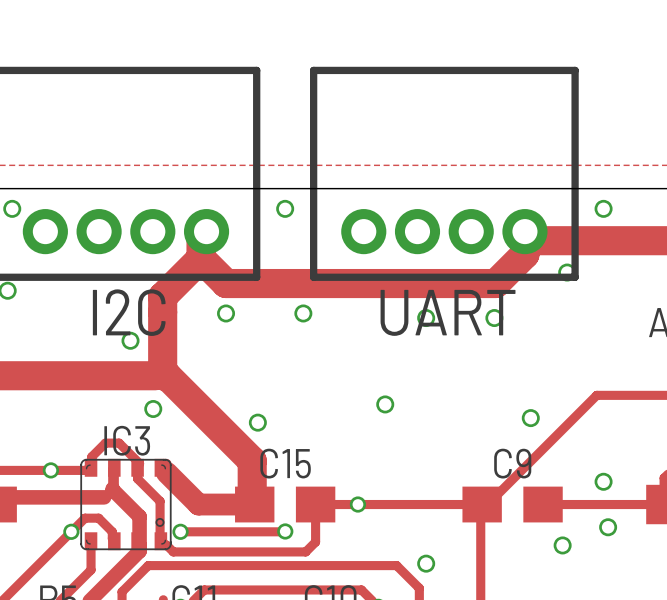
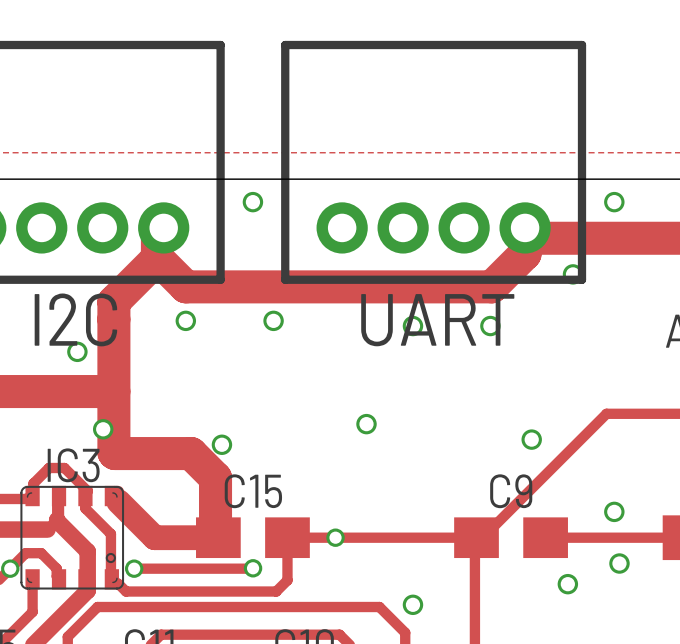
track: (162, 375) (167, 375) (252, 460) -> (113, 391) (114, 453) (191, 453) (215, 477) (215, 488)

